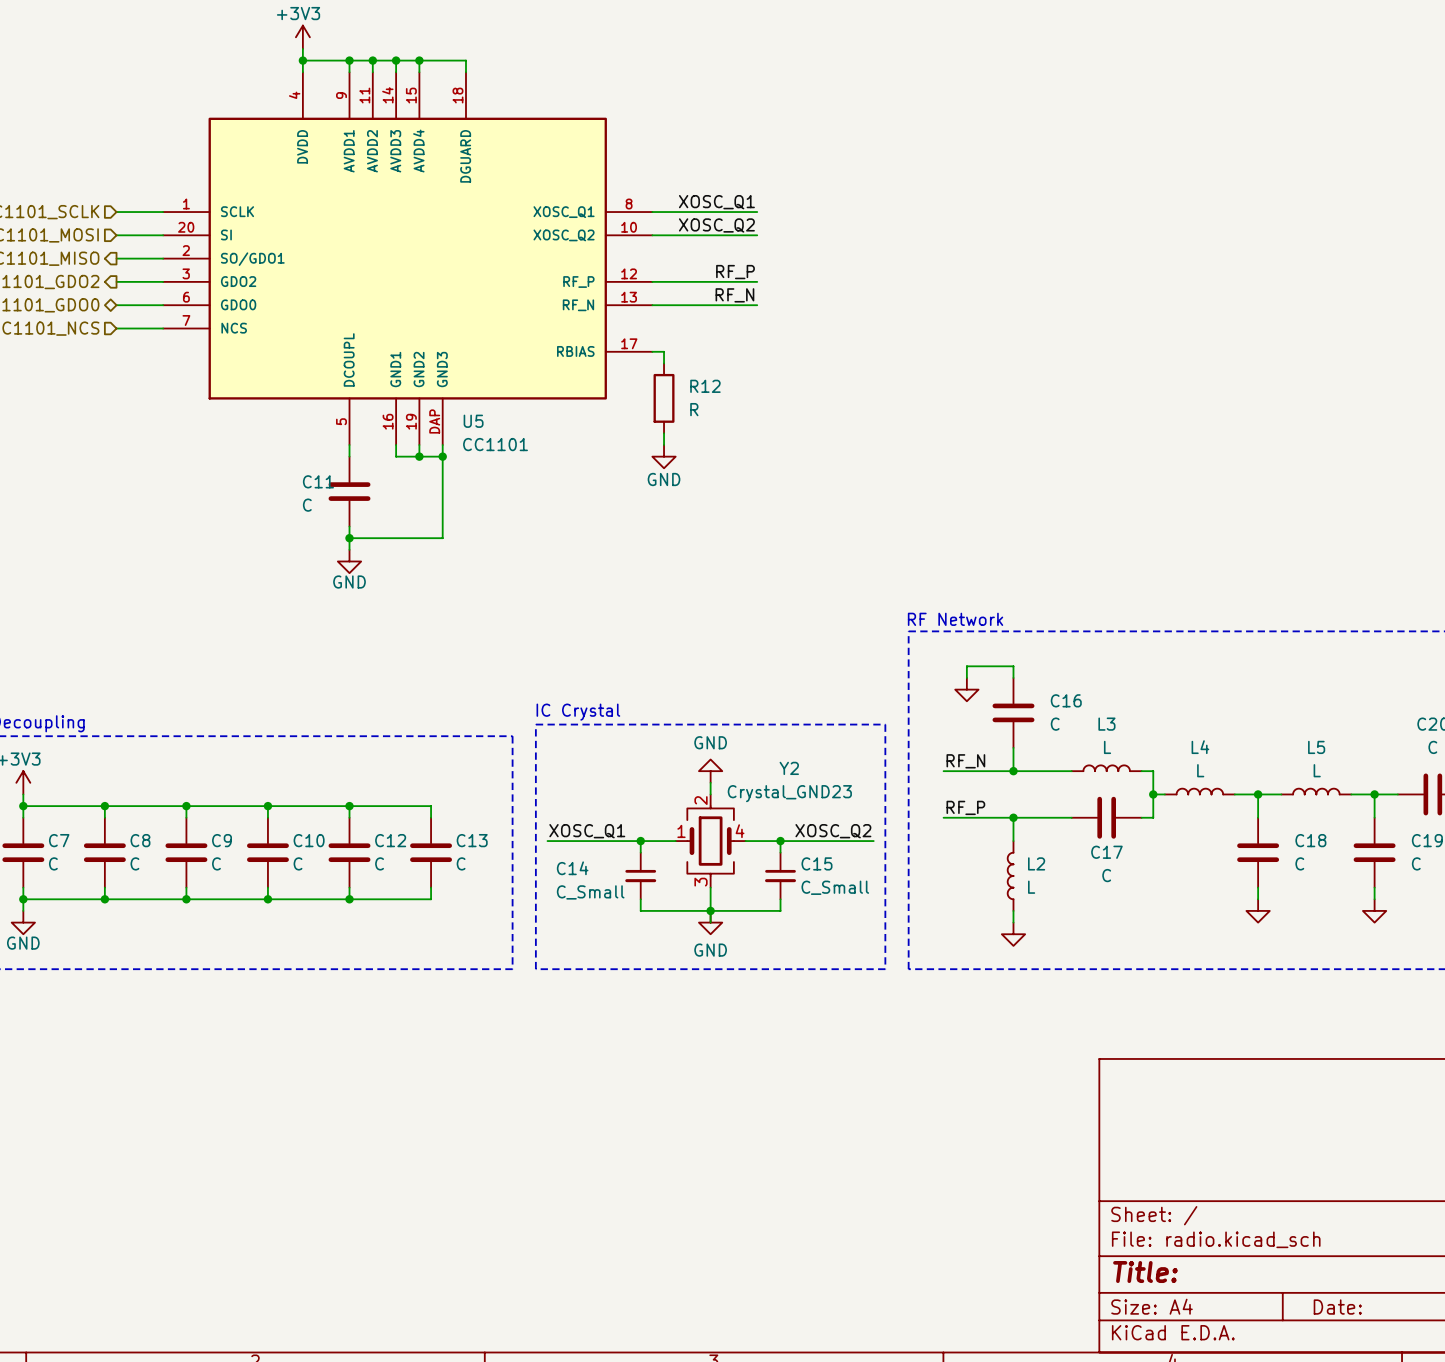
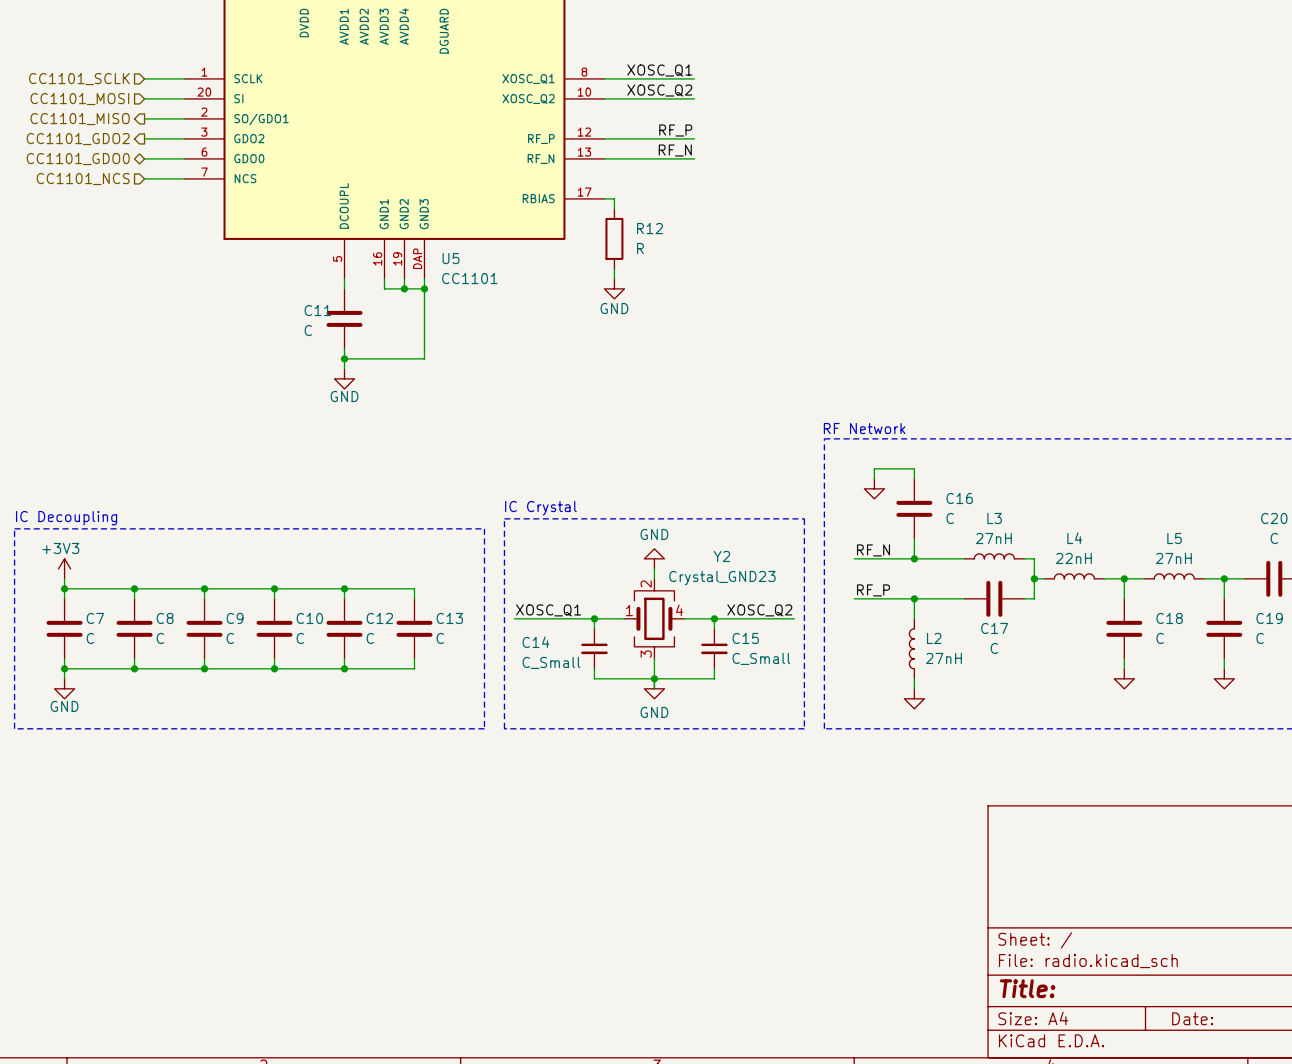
L3 value: L (1107, 747) -> 27nH (993, 538)
L4 value: L (1200, 770) -> 22nH (1073, 558)
L5 value: L (1317, 770) -> 27nH (1173, 558)
L2 value: L (1031, 887) -> 27nH (943, 658)

